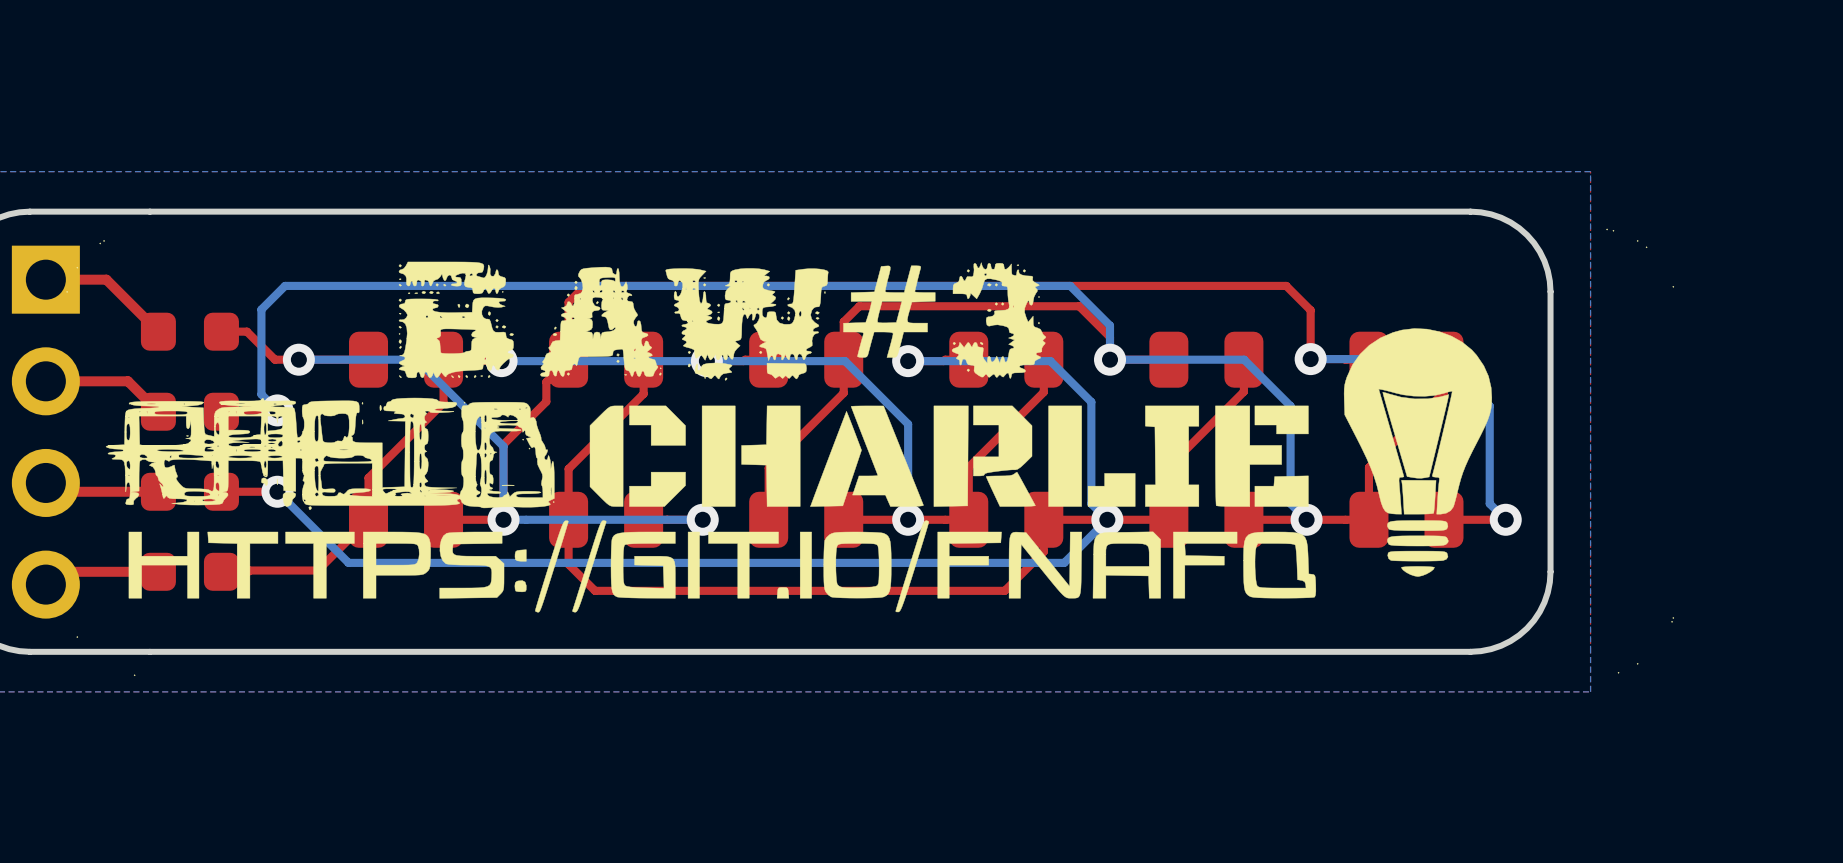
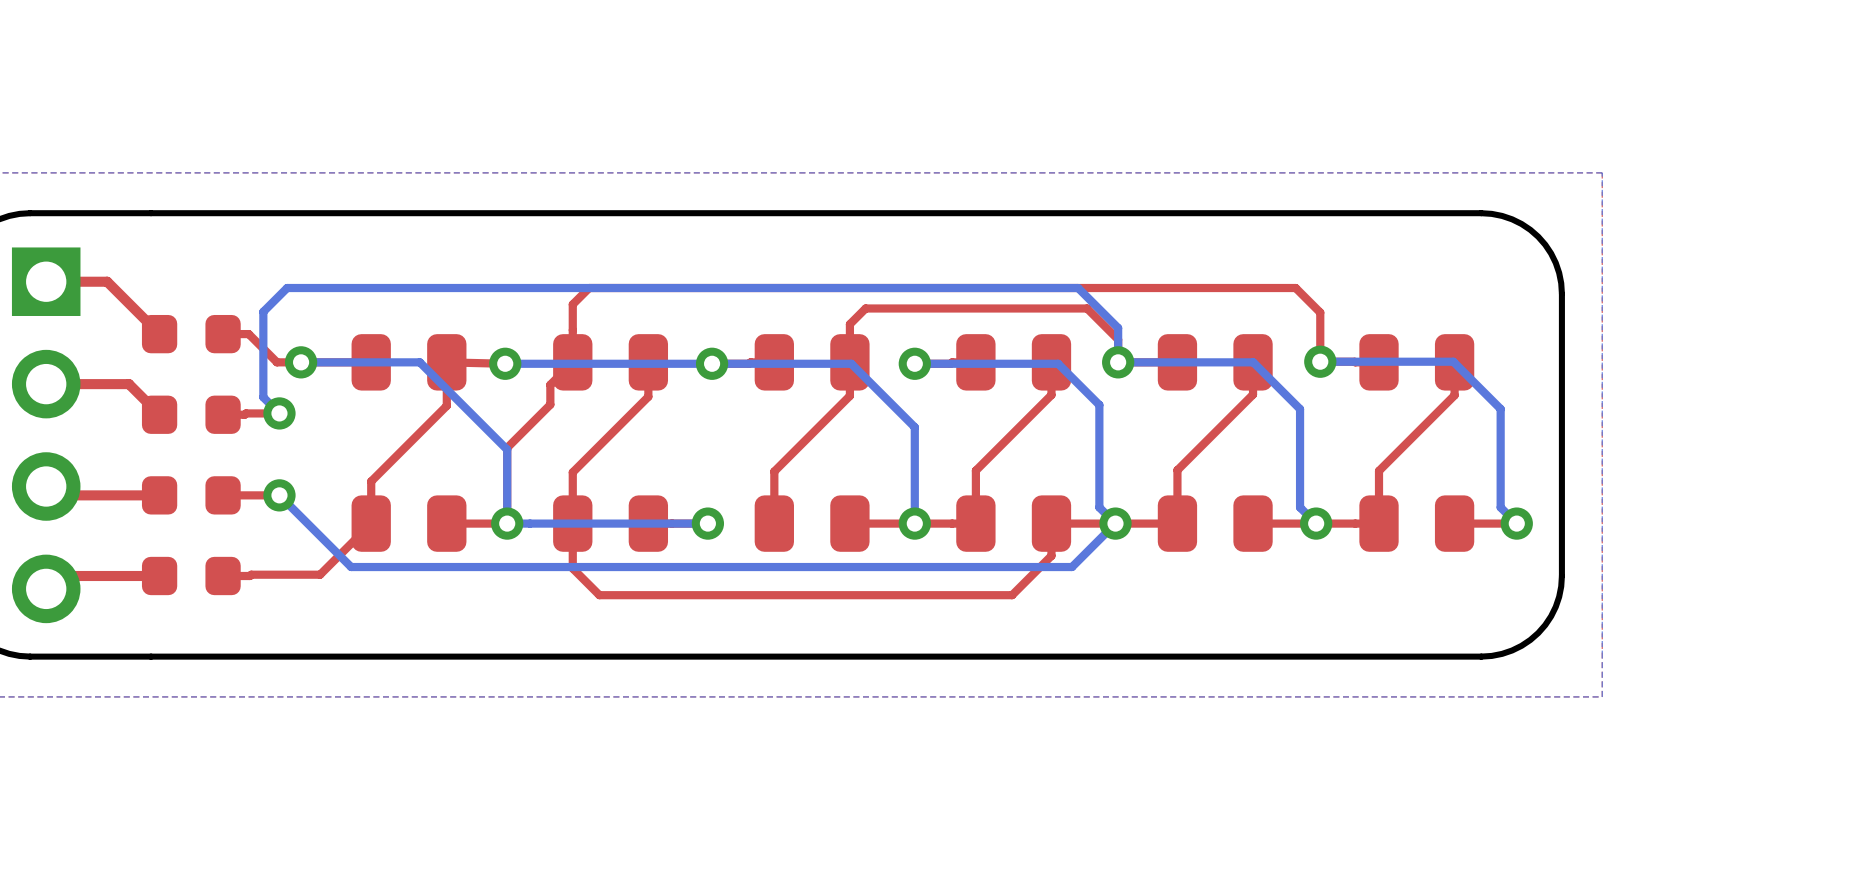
drawing: [66, 228, 1675, 677] -> none

